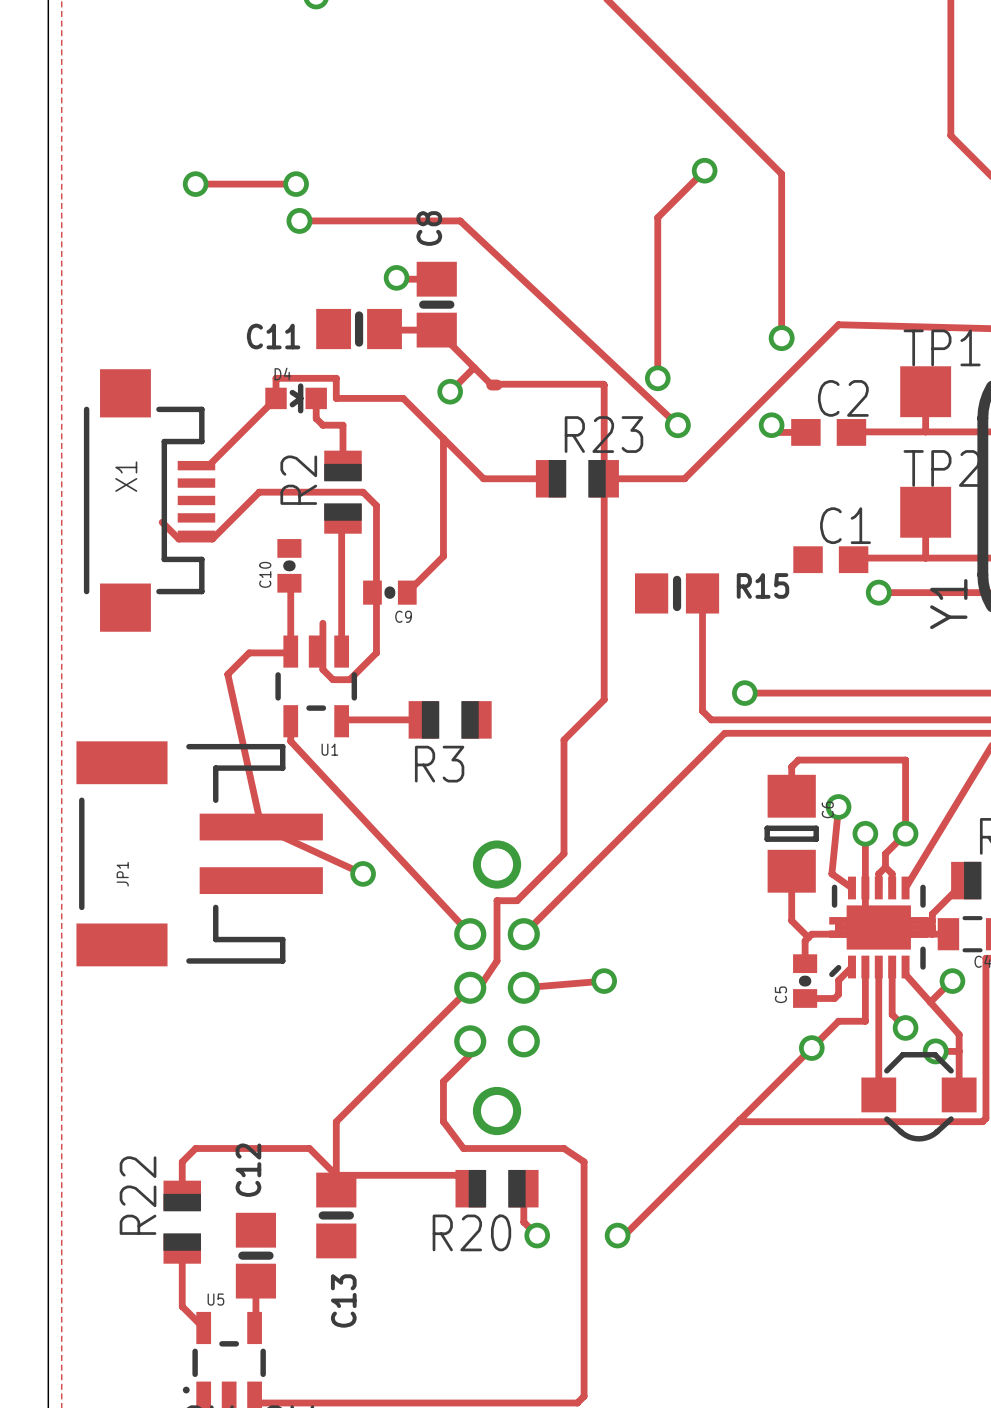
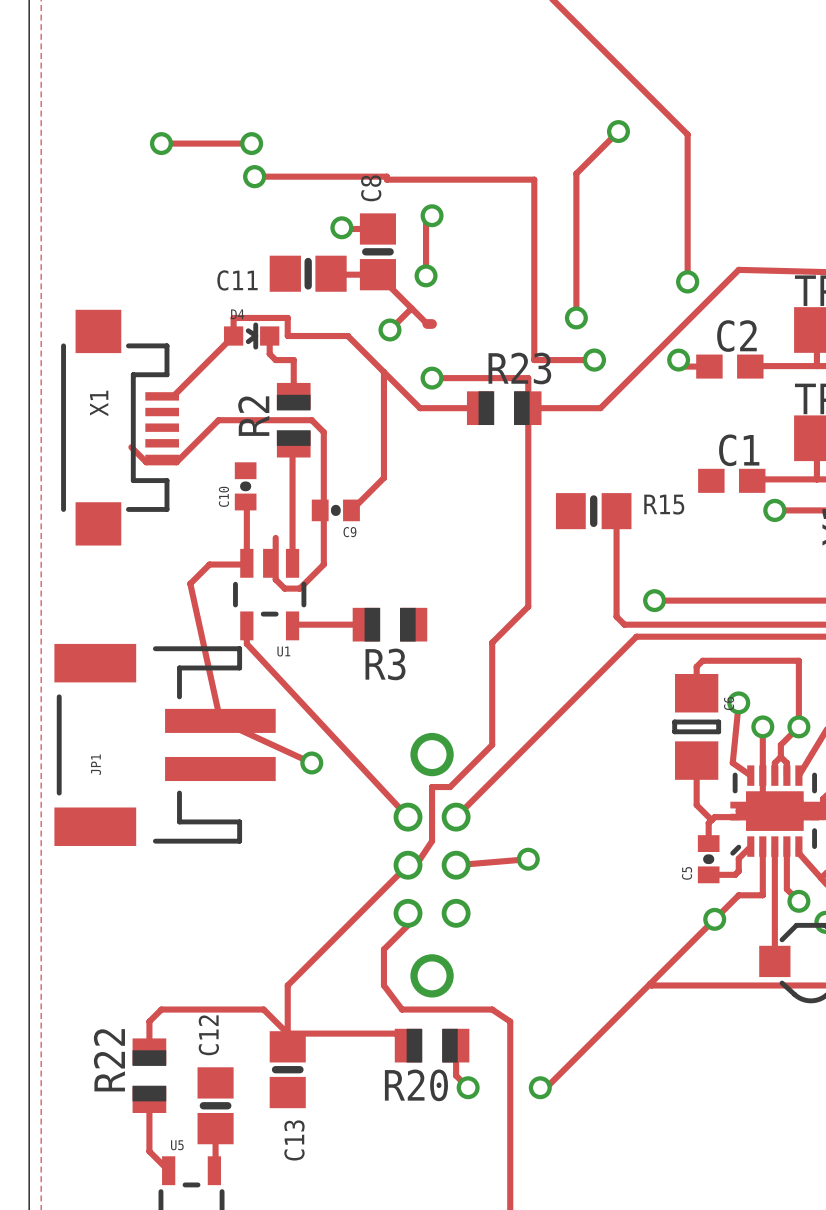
track: (446, 220) (460, 220) (677, 425) -> (386, 176) (386, 179) (534, 179) (534, 360) (594, 360)
track: none -> (432, 215) (426, 221) (426, 275)
via: none -> (432, 215)
via: none -> (426, 275)
track: (497, 384) (603, 384) (604, 445) -> (432, 378) (528, 378)
via: none -> (432, 378)

